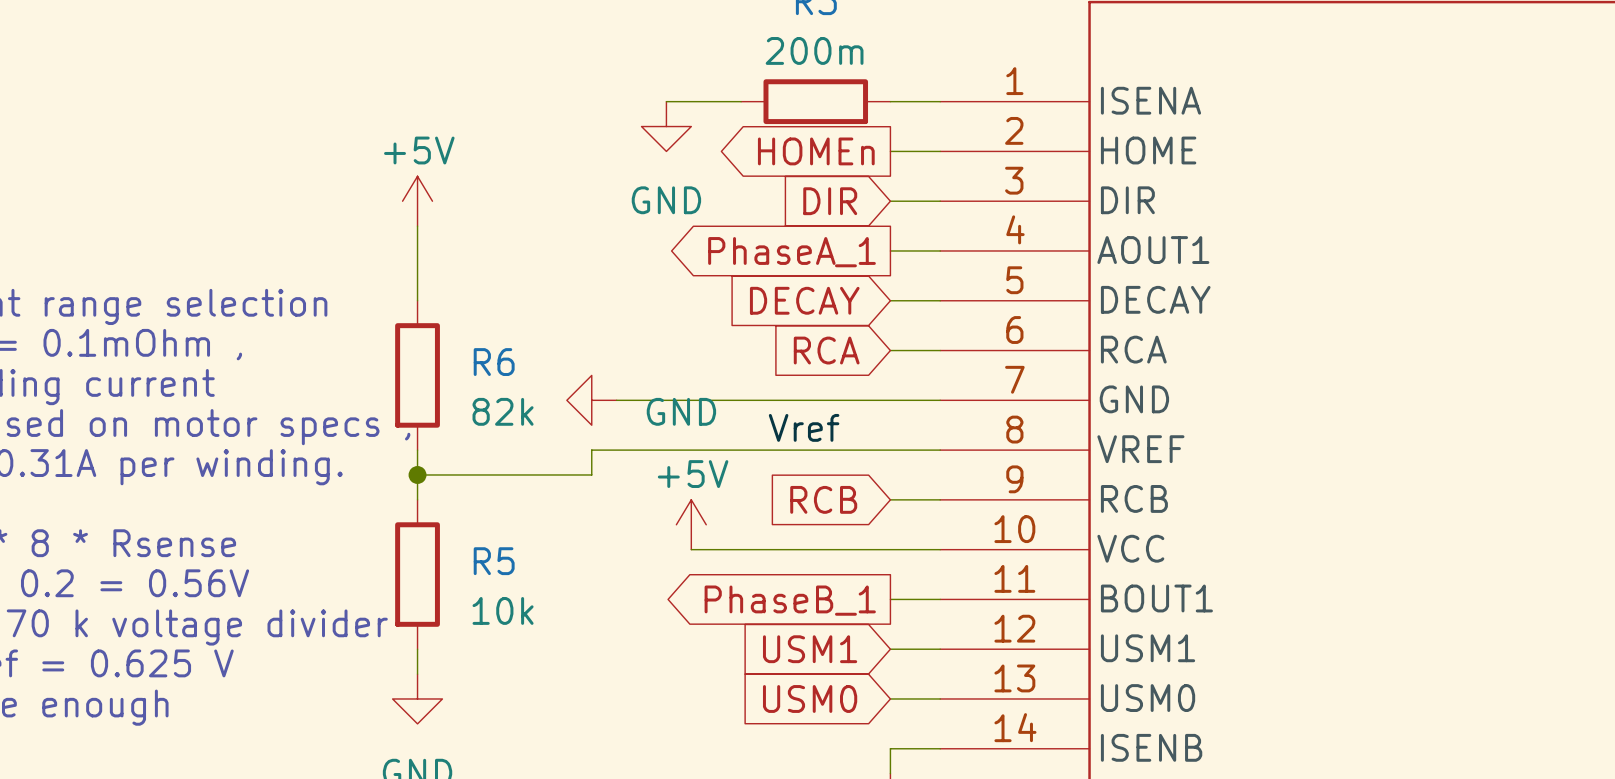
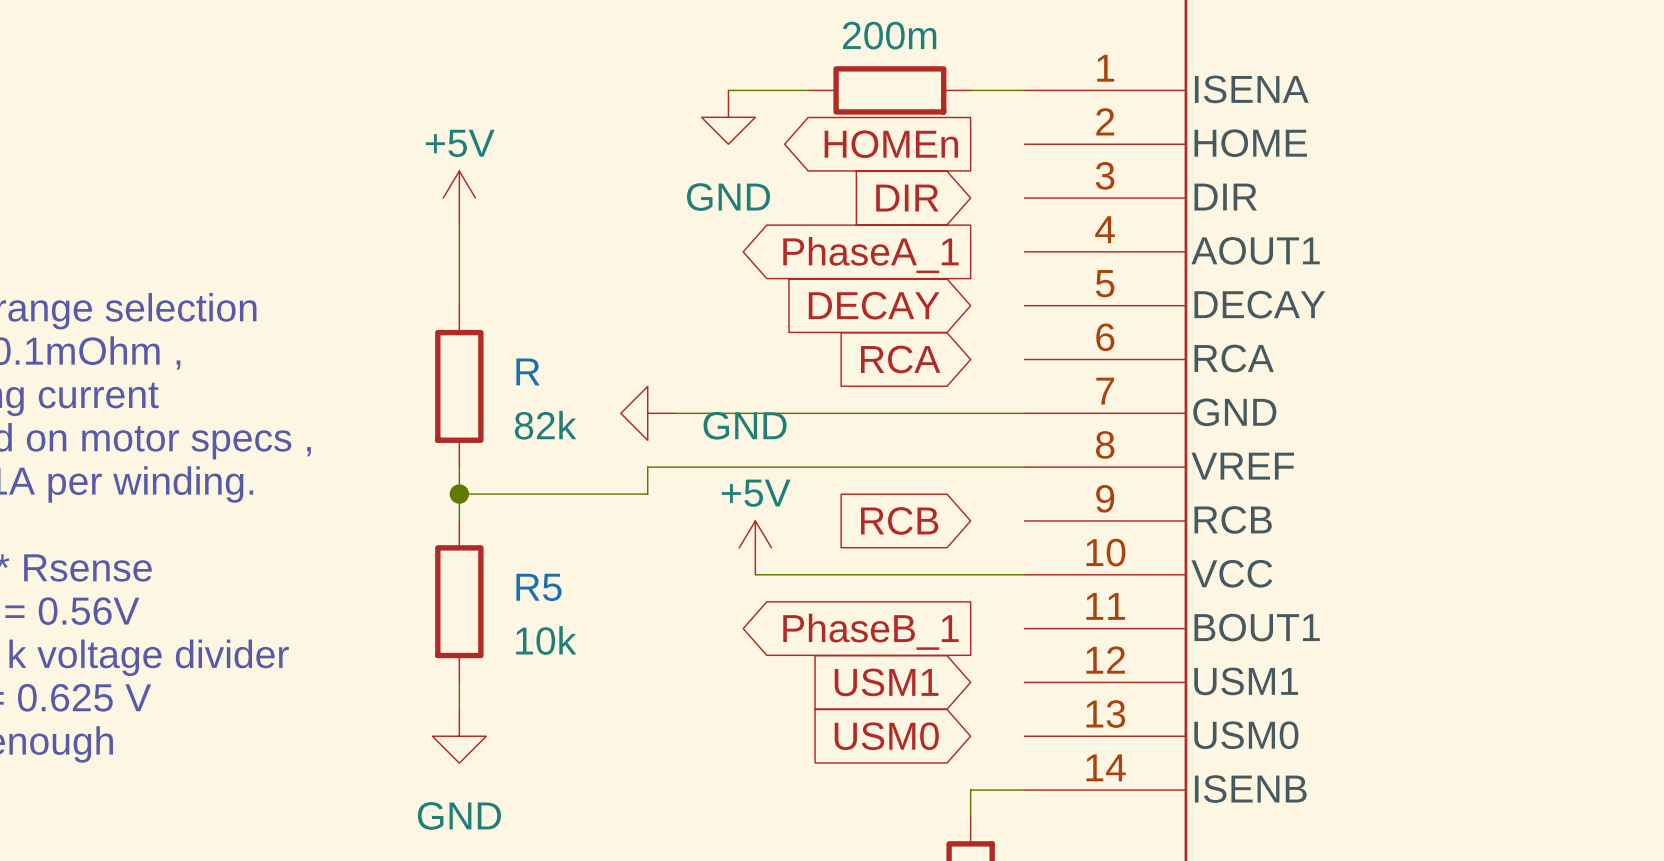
wire: (890, 151) (940, 151) -> none
wire: (890, 201) (940, 201) -> none
wire: (890, 250) (940, 250) -> none
wire: (890, 300) (940, 300) -> none
wire: (890, 350) (940, 350) -> none
R6 name: R6 (494, 362) -> R (527, 371)
label: Vref (804, 427) -> none
wire: (890, 499) (940, 499) -> none
wire: (890, 599) (940, 599) -> none
wire: (890, 649) (940, 649) -> none
wire: (890, 698) (940, 698) -> none

